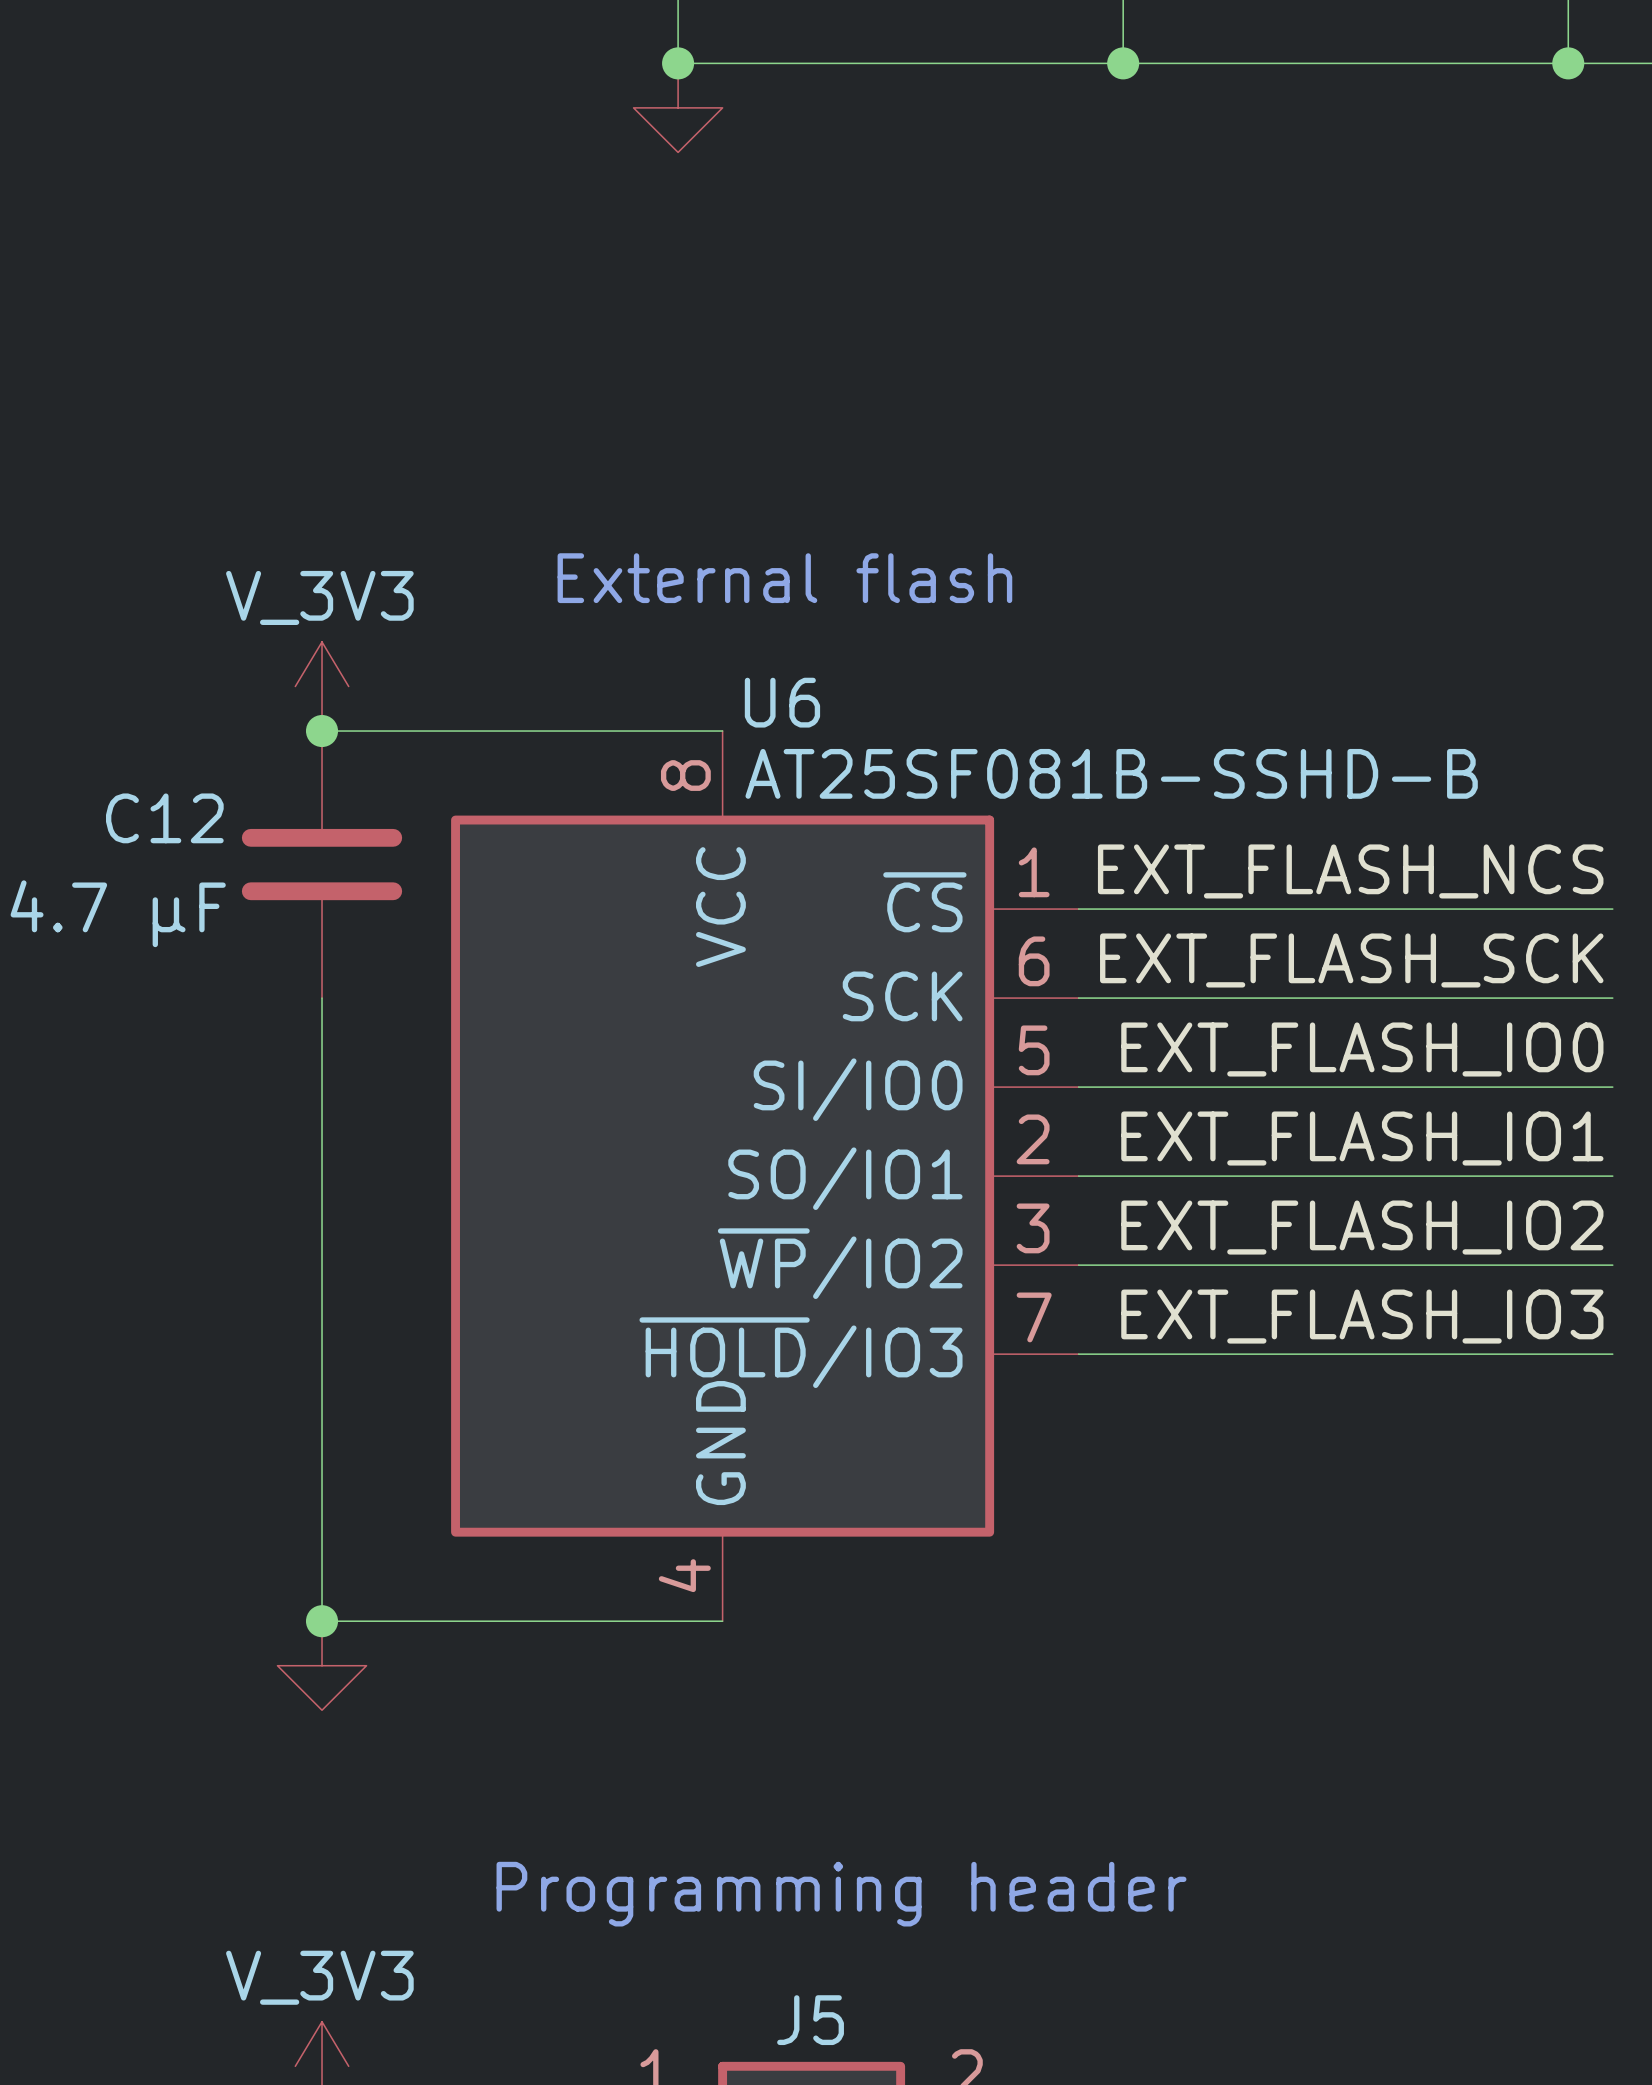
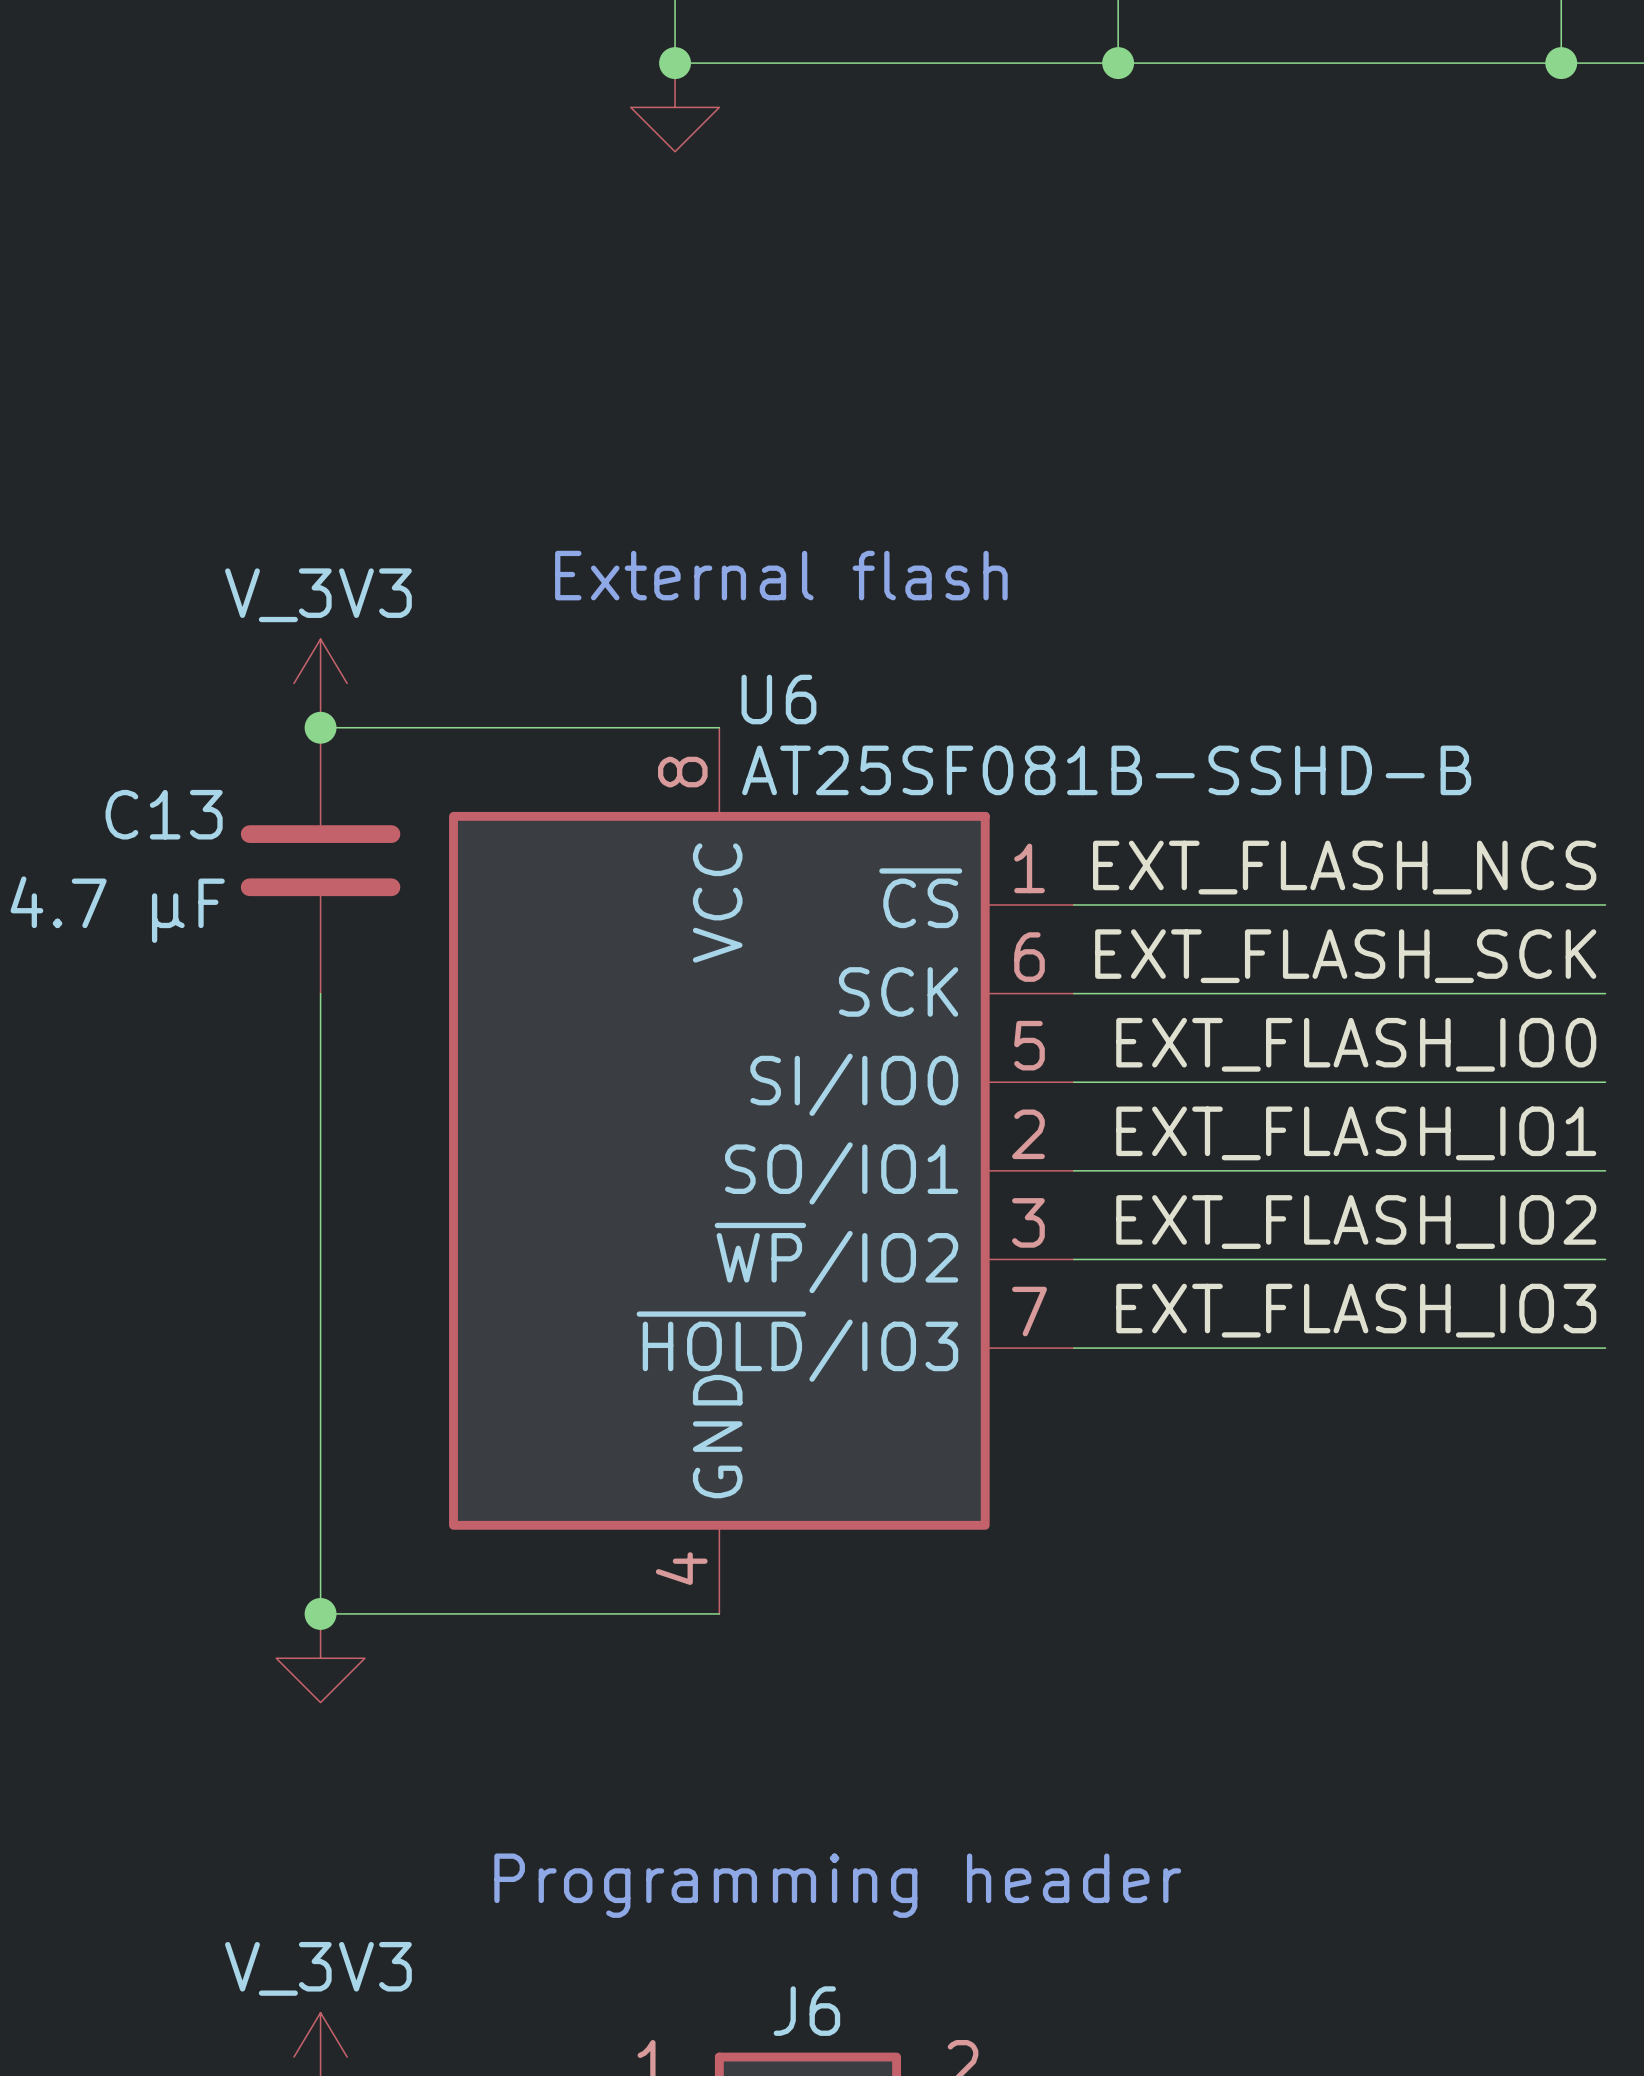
C12 name: C12 (164, 818) -> C13 (164, 814)
J5 name: J5 (810, 2020) -> J6 (806, 2011)

